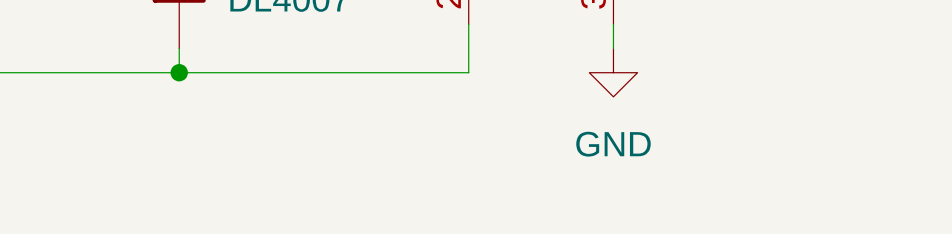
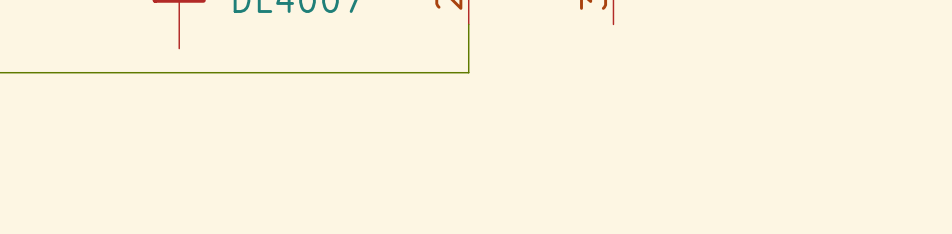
wire: (613, 24) (613, 48) -> none
wire: (179, 48) (179, 72) -> none
junction: (179, 72) -> none
power symbol: GND (613, 72) -> none

